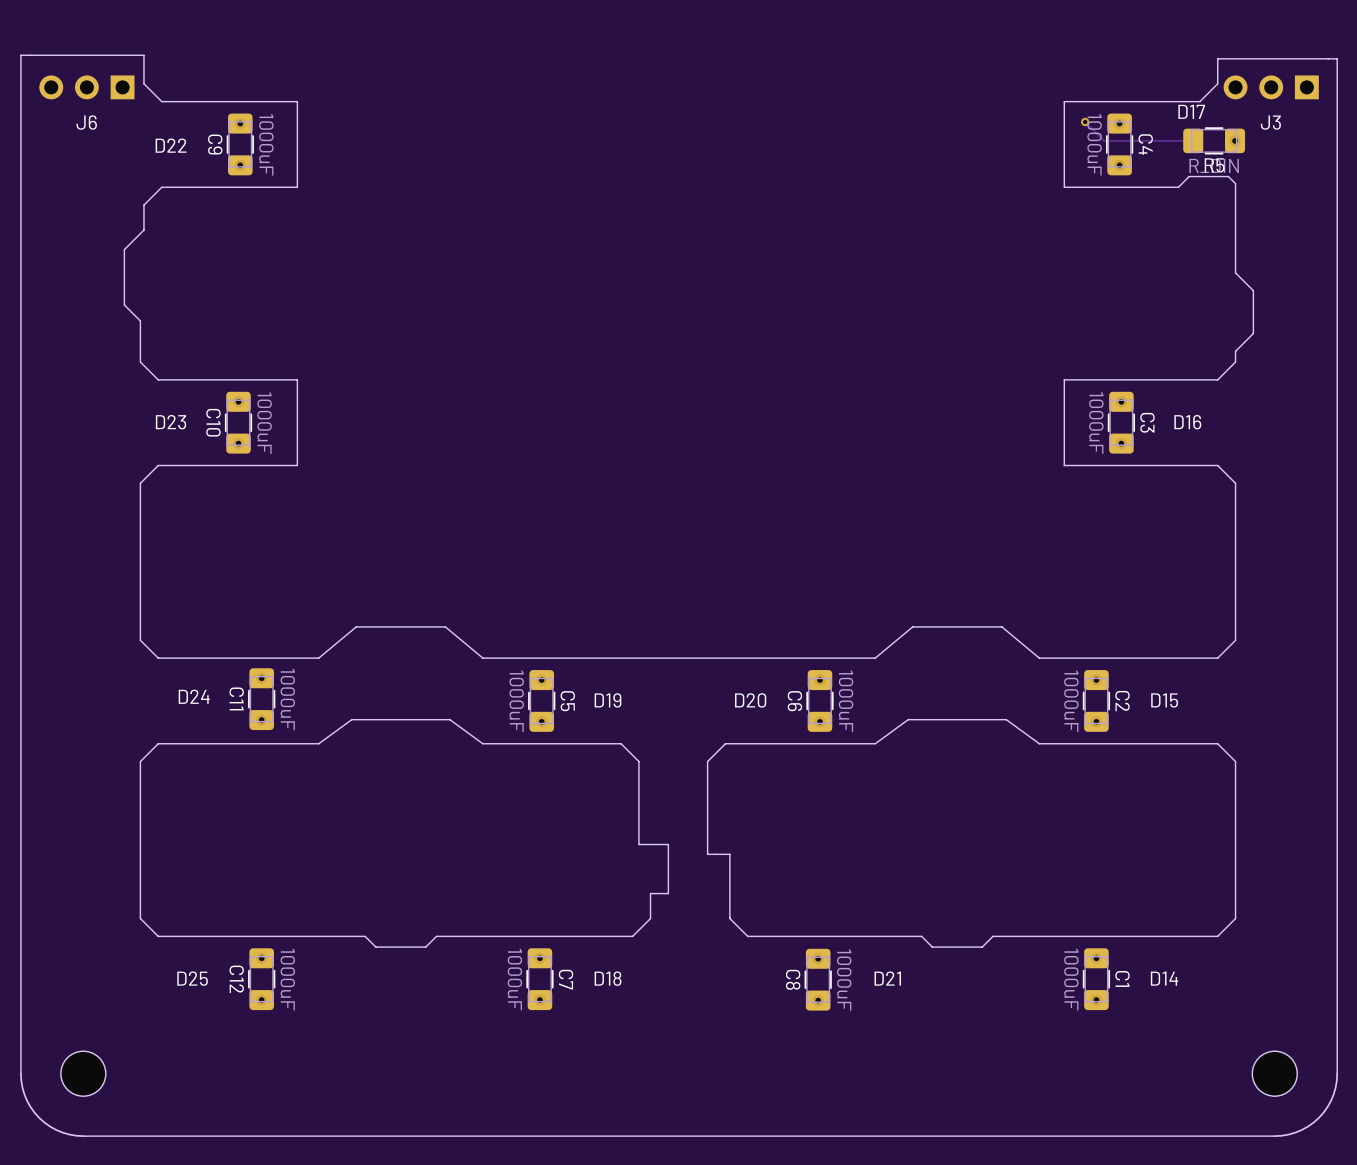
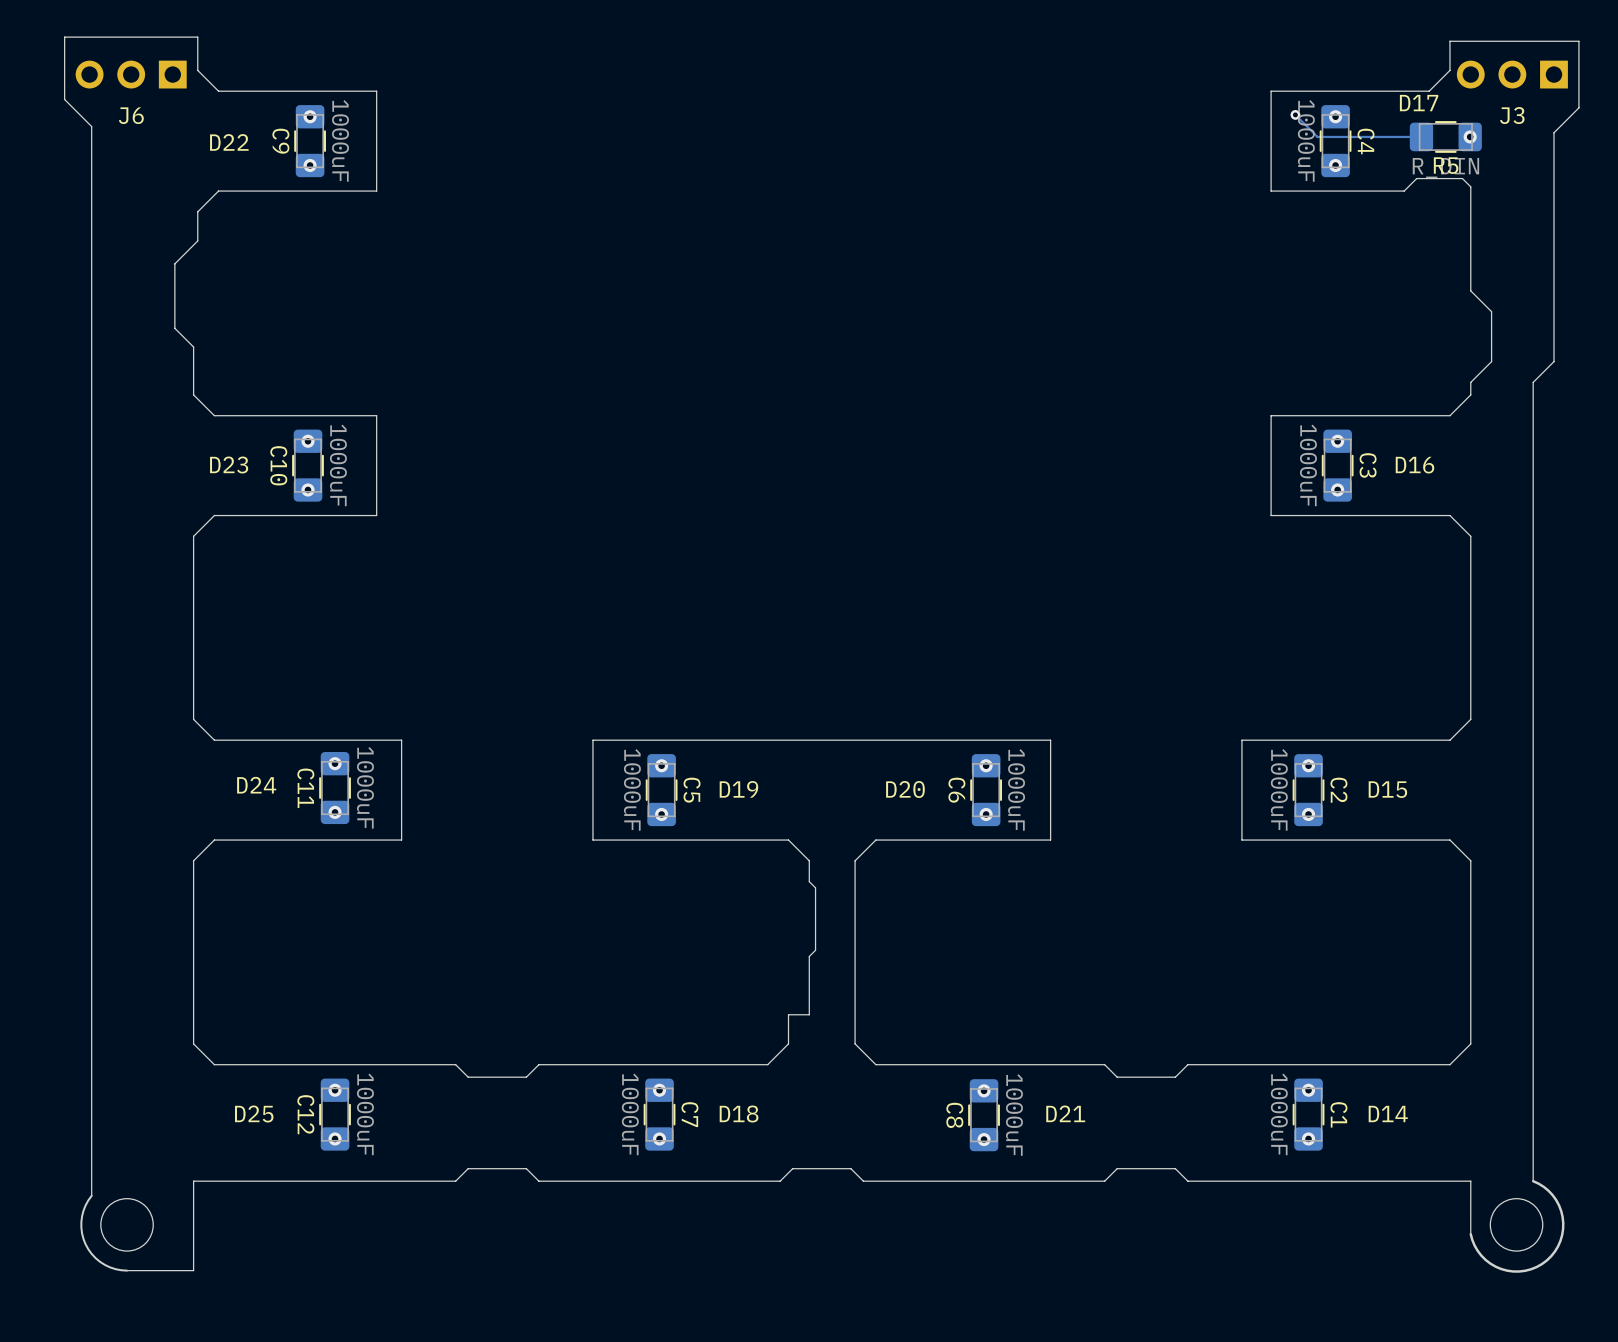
board edge: (29, 55) (20, 55) (20, 1073) (24, 1094) (30, 1106) (39, 1117) (50, 1126) (62, 1132) (83, 1136) (1274, 1136) (1295, 1132) (1313, 1122) (1323, 1112) (1331, 1100) (1335, 1087) (1337, 1073) (1337, 58) (1328, 58) -> (91, 1195) (83, 1210) (81, 1227) (88, 1249) (100, 1261) (121, 1270) (193, 1270) (193, 1181) (455, 1181) (468, 1168) (526, 1168) (538, 1181) (780, 1181) (792, 1168) (850, 1168) (863, 1181) (1104, 1181) (1117, 1168) (1175, 1168) (1187, 1181) (1470, 1181) (1470, 1234) (1474, 1245) (1481, 1255) (1495, 1266) (1513, 1271) (1531, 1269) (1546, 1260) (1554, 1251) (1560, 1240) (1563, 1222) (1561, 1211) (1556, 1200) (1548, 1190) (1533, 1181) (1533, 382) (1553, 361) (1553, 132) (1578, 107) (1578, 41)
board edge: none -> (64, 37) (64, 99) (91, 126) (91, 1195)
board edge: (482, 658) (445, 626) (356, 626) (318, 658) -> (592, 740) (592, 840)
board edge: (1039, 658) (1001, 626) (912, 626) (875, 658) -> (1241, 740) (1241, 840)
board edge: (482, 743) (449, 719) (351, 719) (318, 743) -> (401, 740) (401, 840)
board edge: (621, 743) (638, 761) (638, 844) (668, 844) -> (754, 840) (788, 840) (809, 860) (809, 881) (815, 887) (815, 950) (809, 957)
board edge: (1039, 743) (1006, 719) (908, 719) (875, 743) -> (1050, 740) (1050, 840)
board edge: (707, 854) (729, 854) (729, 918) (747, 936) -> (855, 969) (855, 1043) (875, 1064) (901, 1064)

